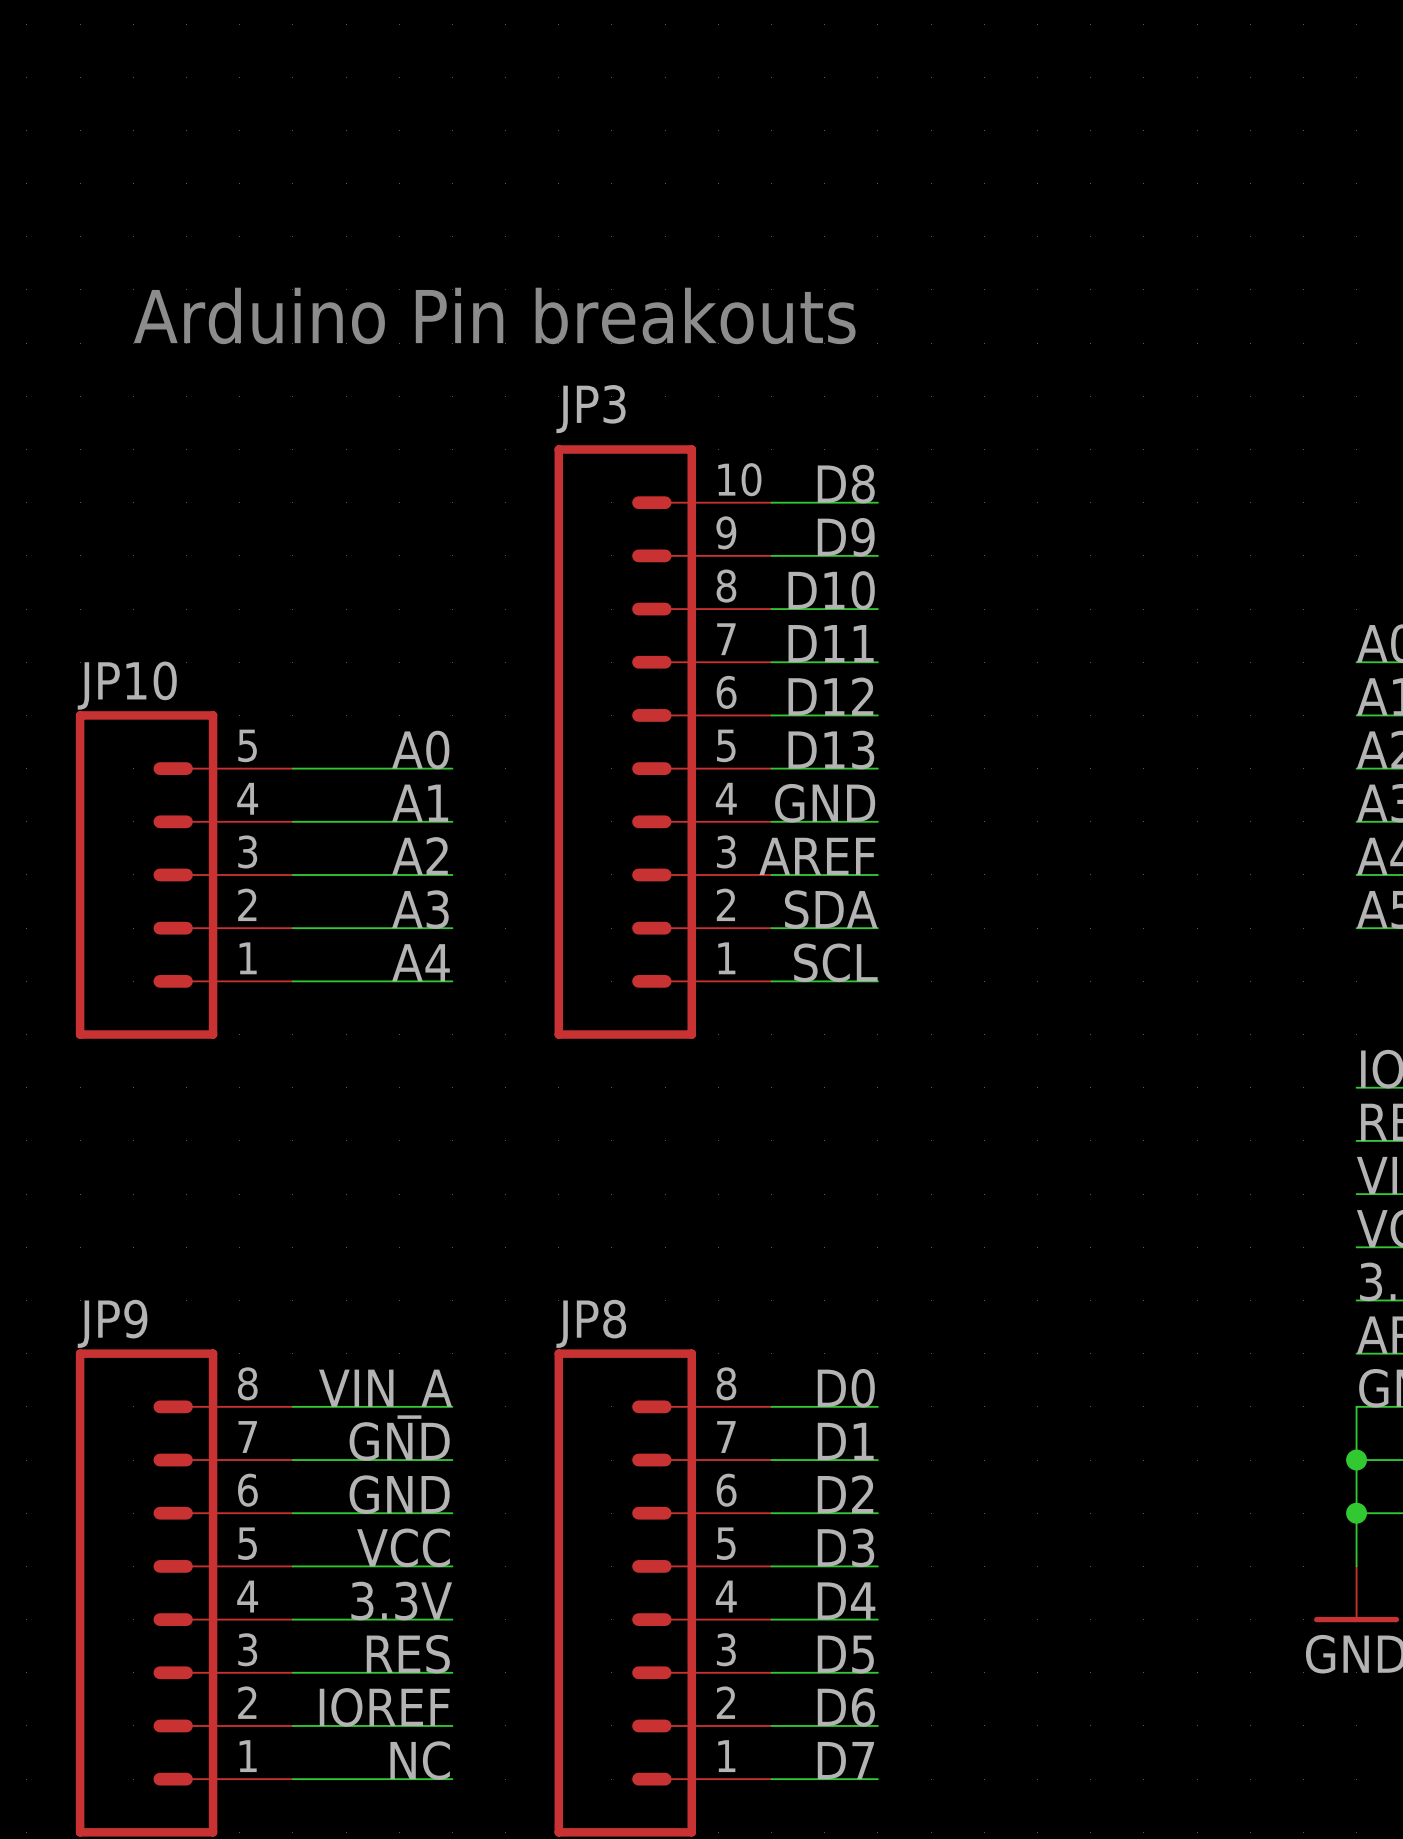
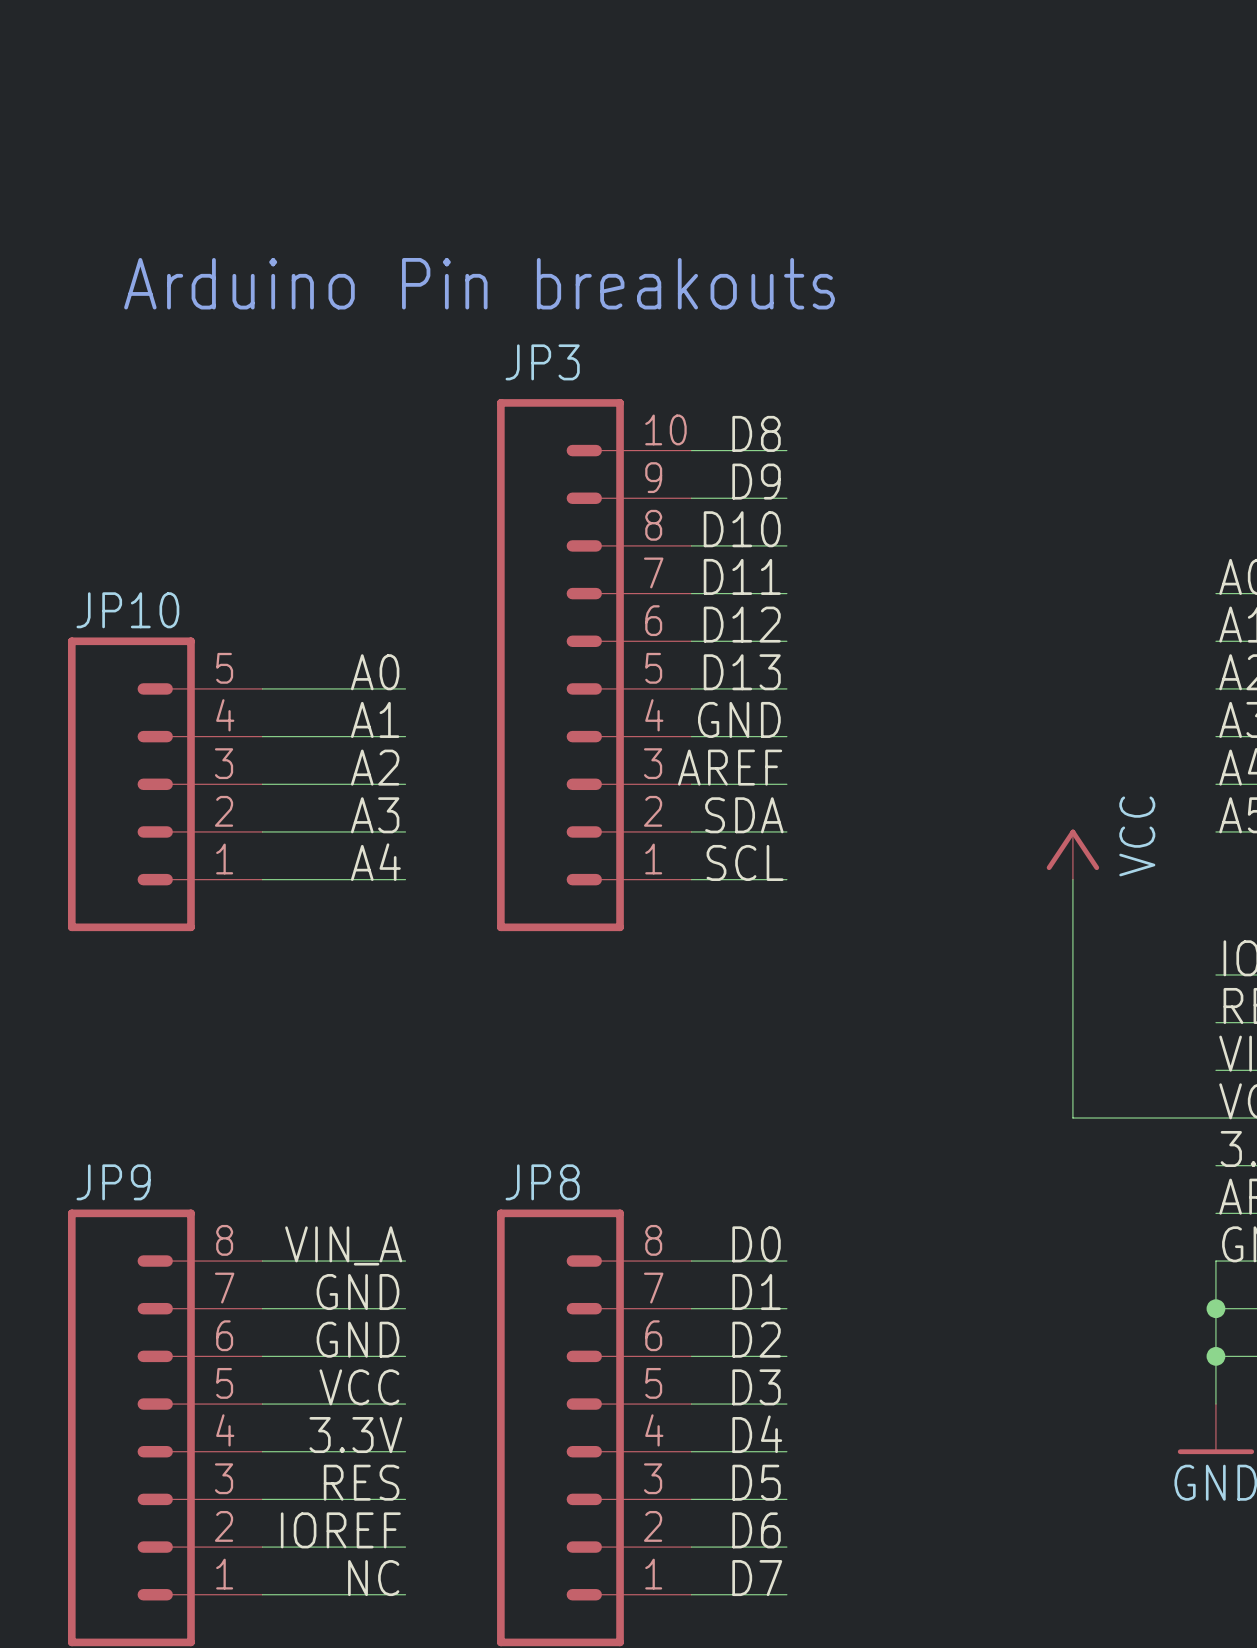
power symbol: none -> VCC (1072, 854)
wire: none -> (1072, 879) (1072, 1118) (1215, 1118)

